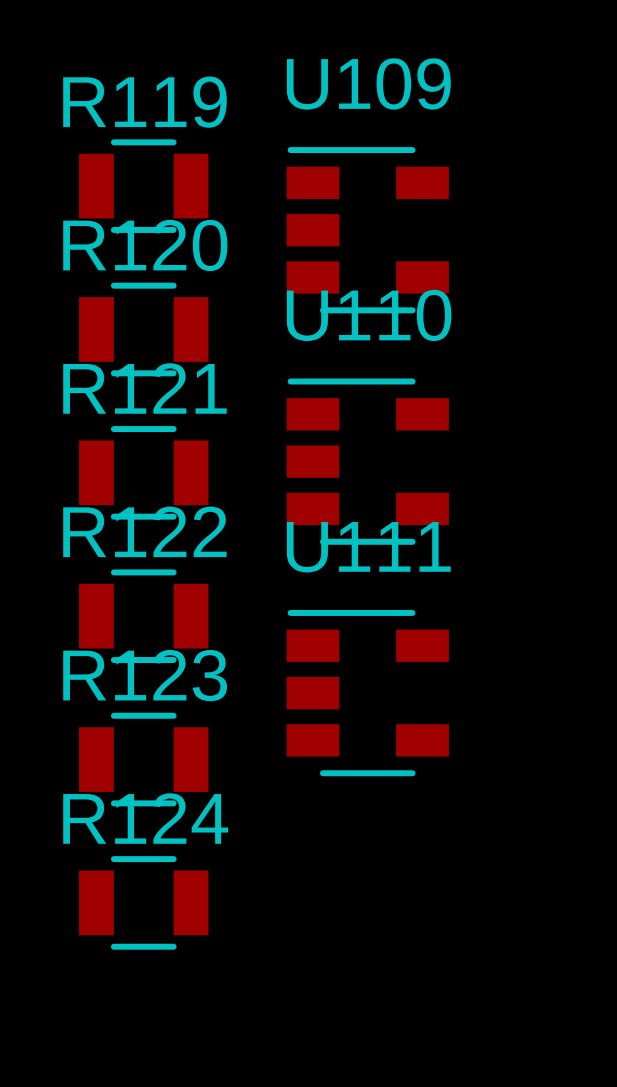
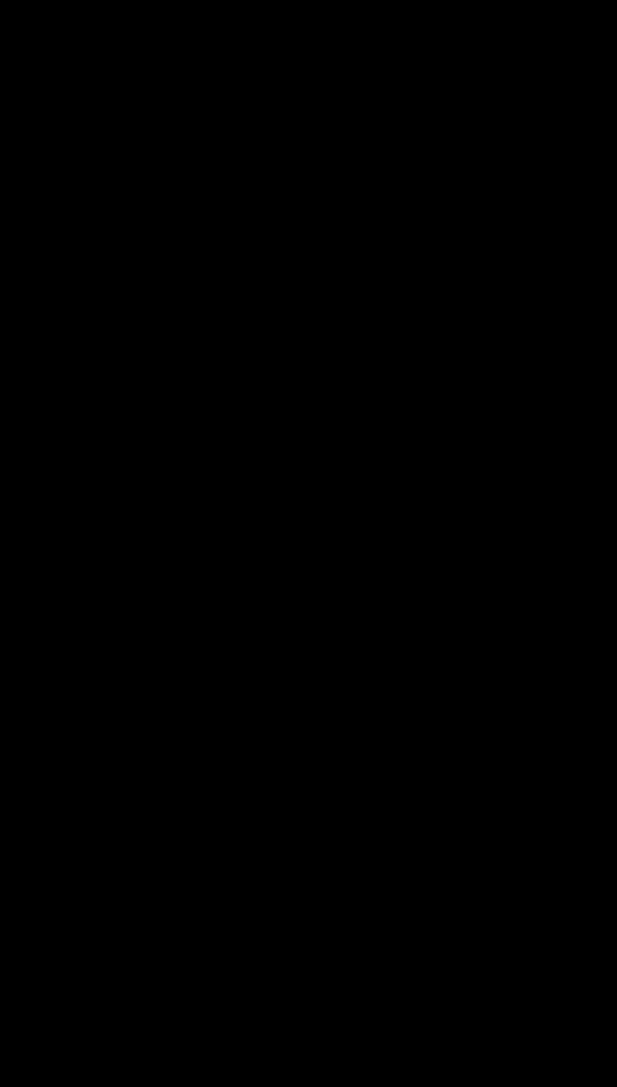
R119: (143, 186) -> none
U109: (367, 230) -> none
R120: (143, 329) -> none
U110: (367, 461) -> none
R121: (143, 472) -> none
R122: (143, 616) -> none
U111: (367, 693) -> none
R123: (143, 759) -> none
R124: (143, 902) -> none

